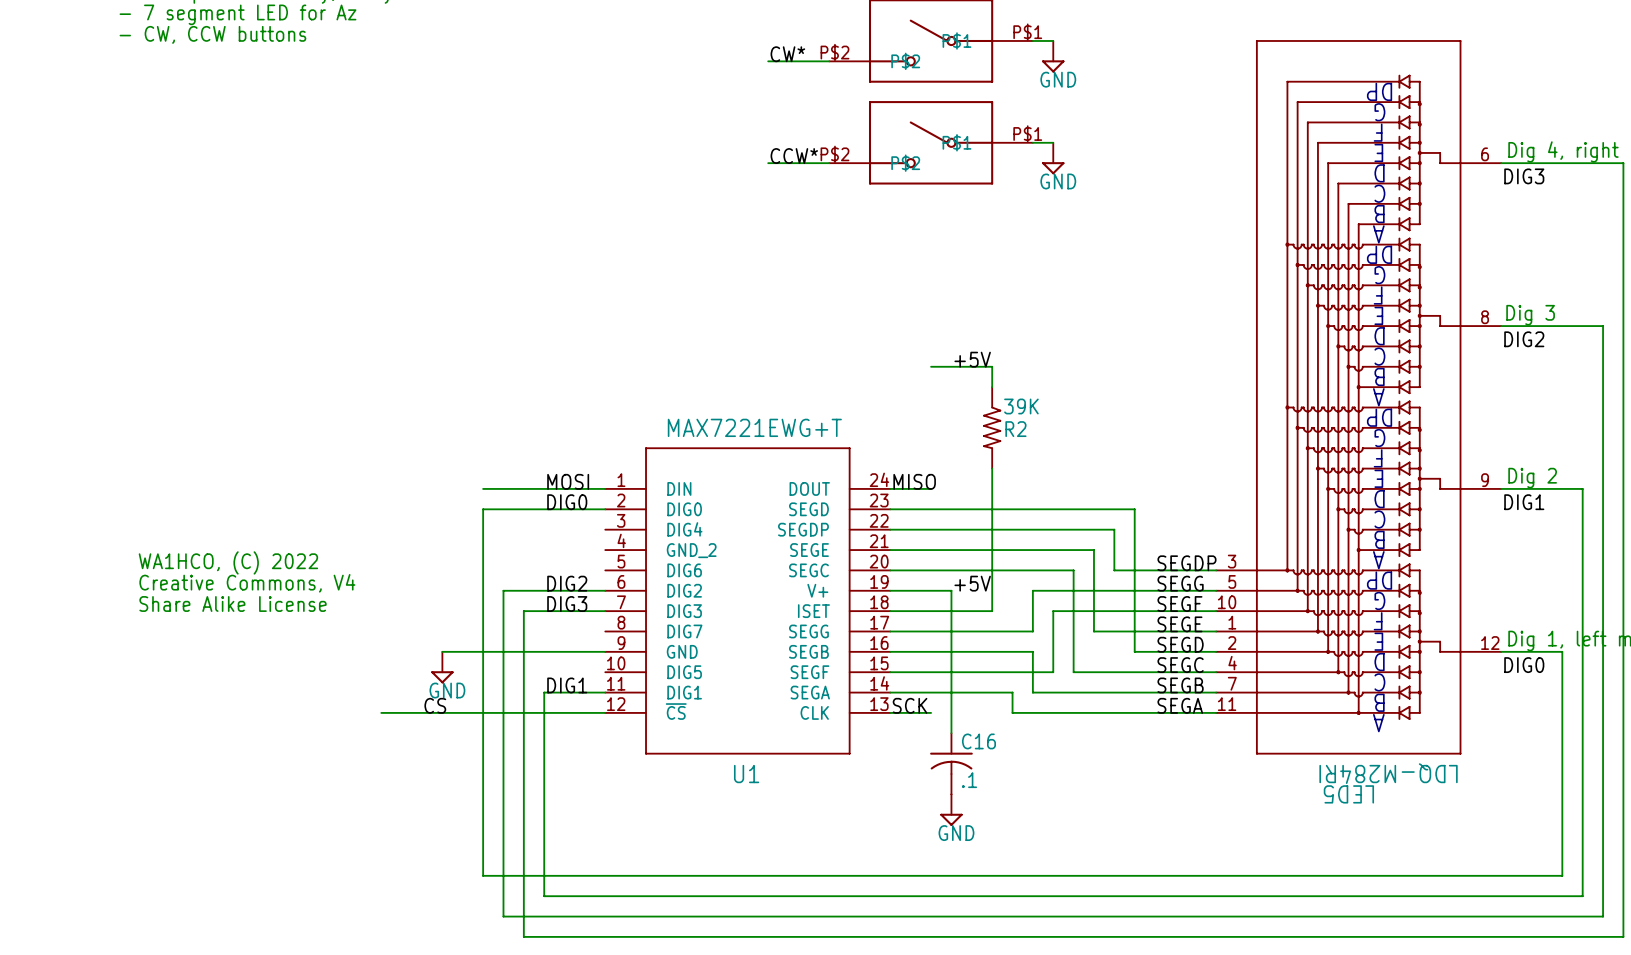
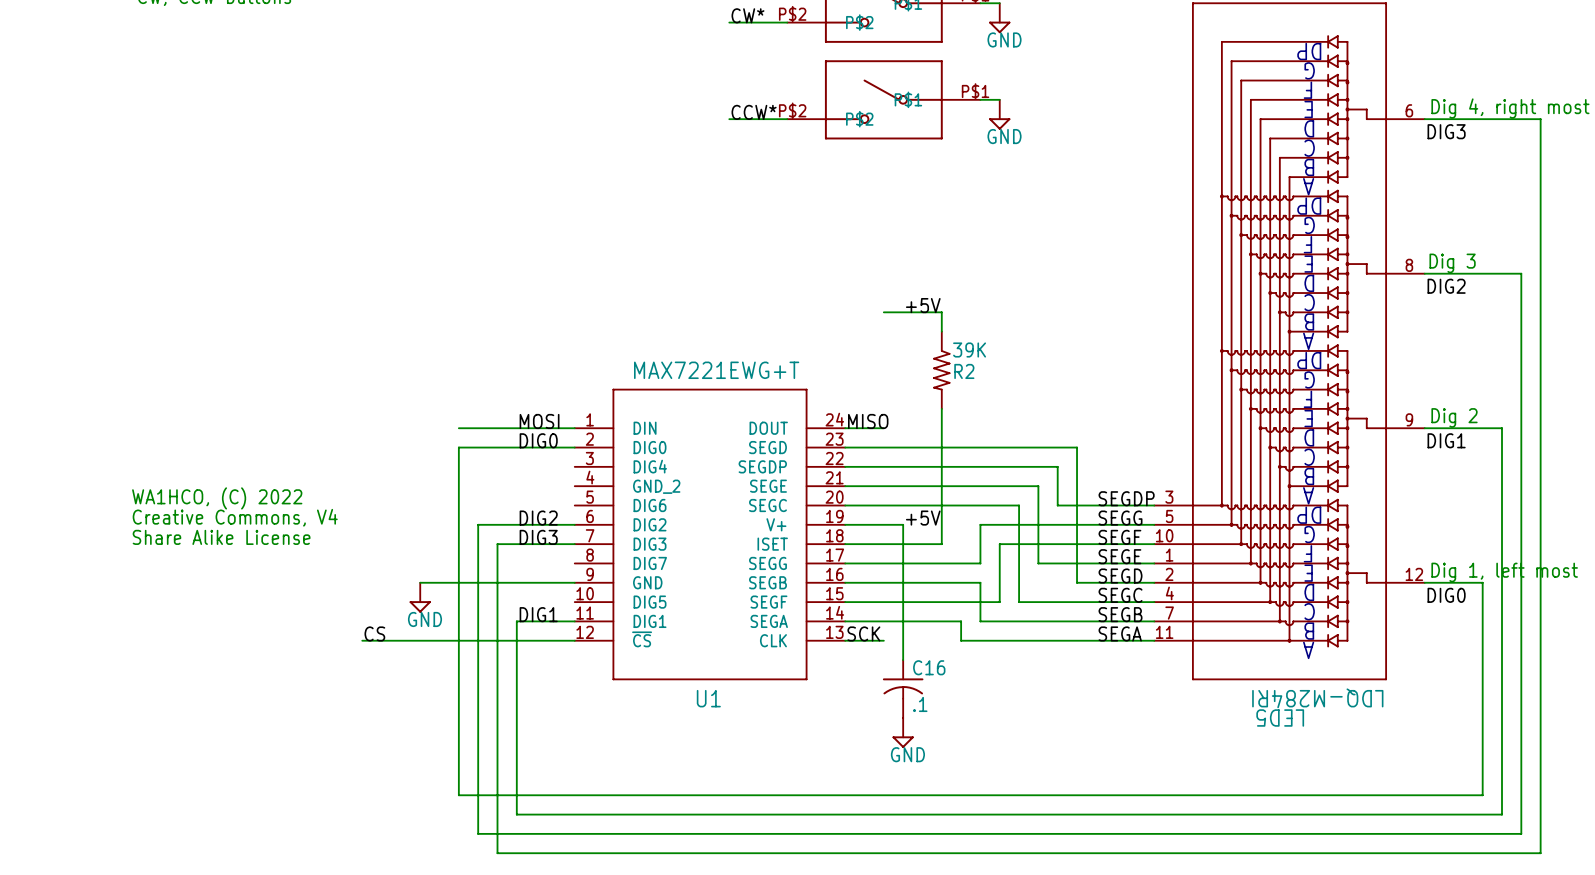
label position: CS (435, 705) -> CS (374, 633)

